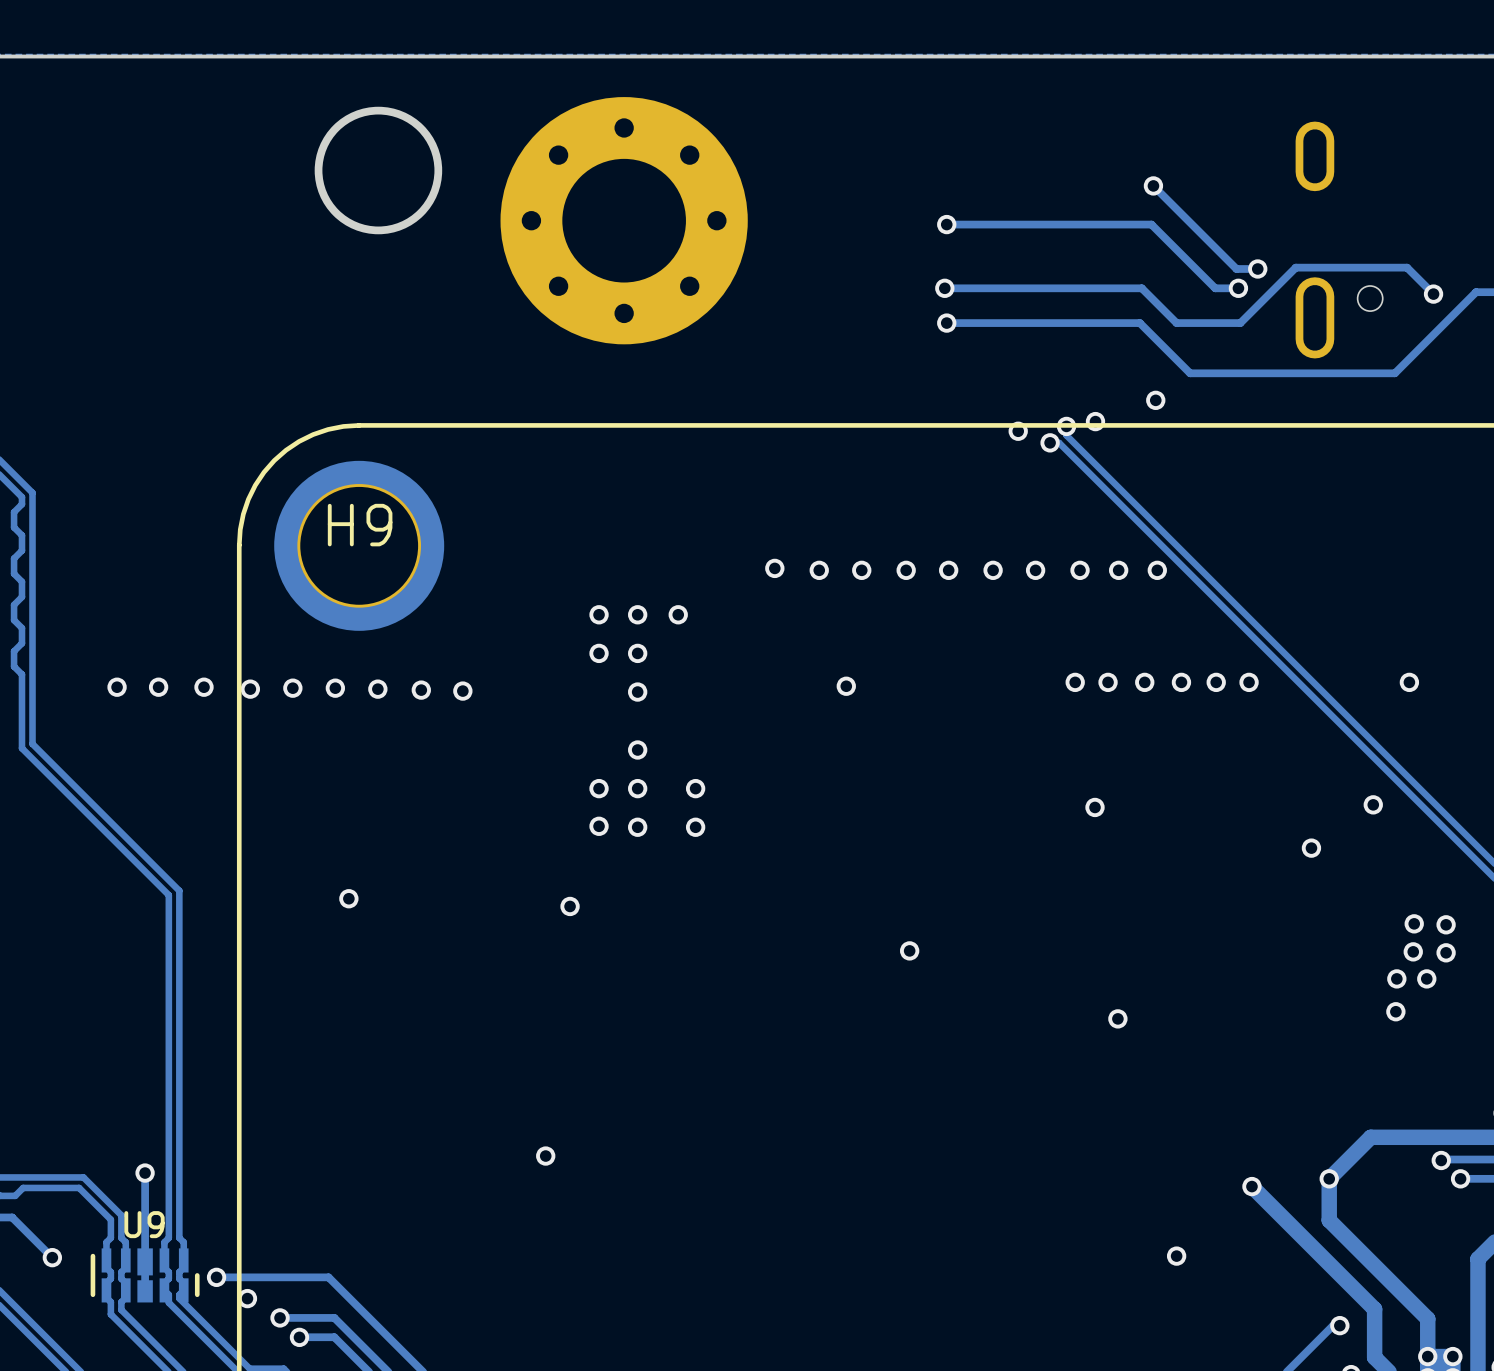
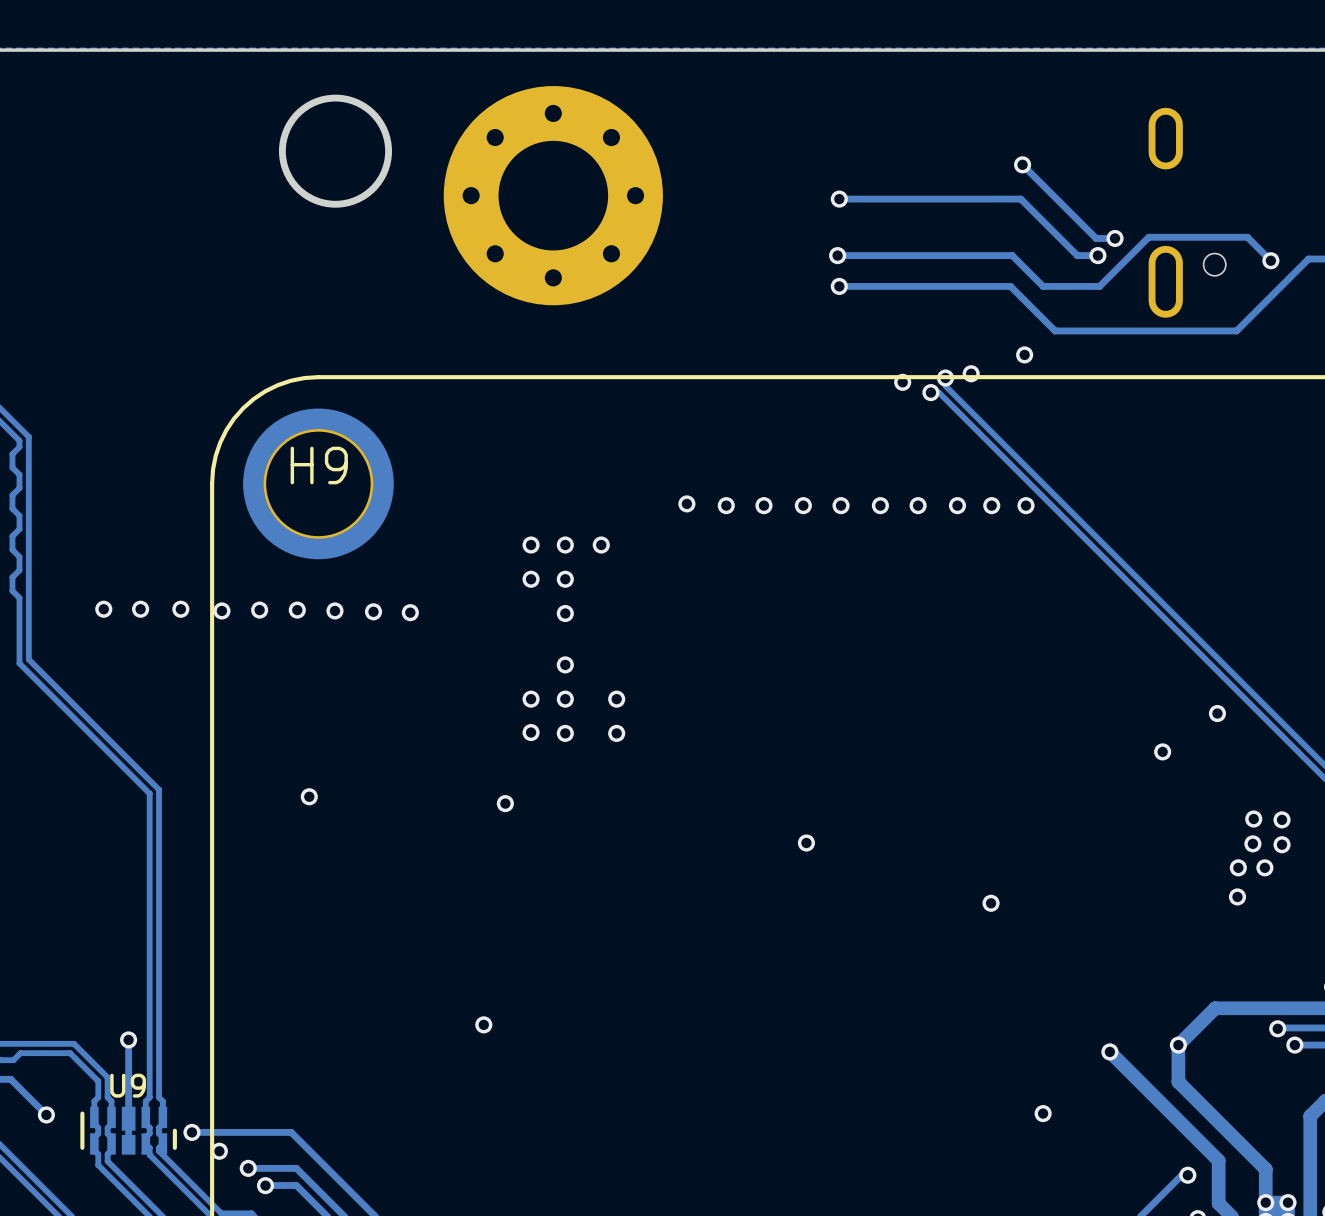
via: (1075, 682) -> none
via: (1108, 682) -> none
via: (1144, 682) -> none
via: (1181, 682) -> none
via: (1216, 682) -> none
via: (1249, 682) -> none
via: (1409, 682) -> none
via: (846, 686) -> none
via: (1095, 807) -> none

